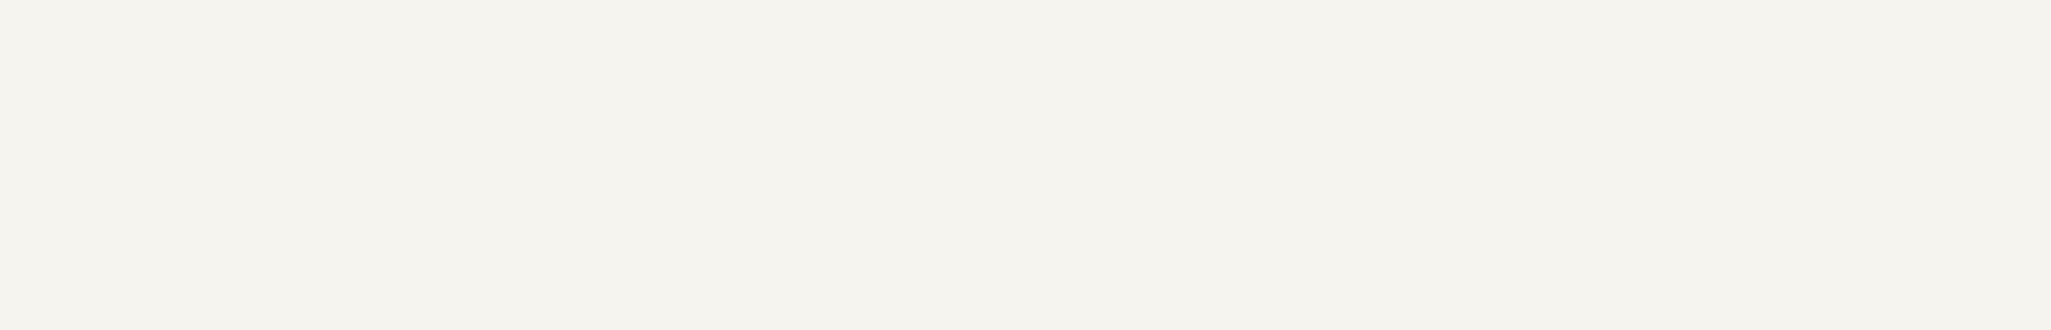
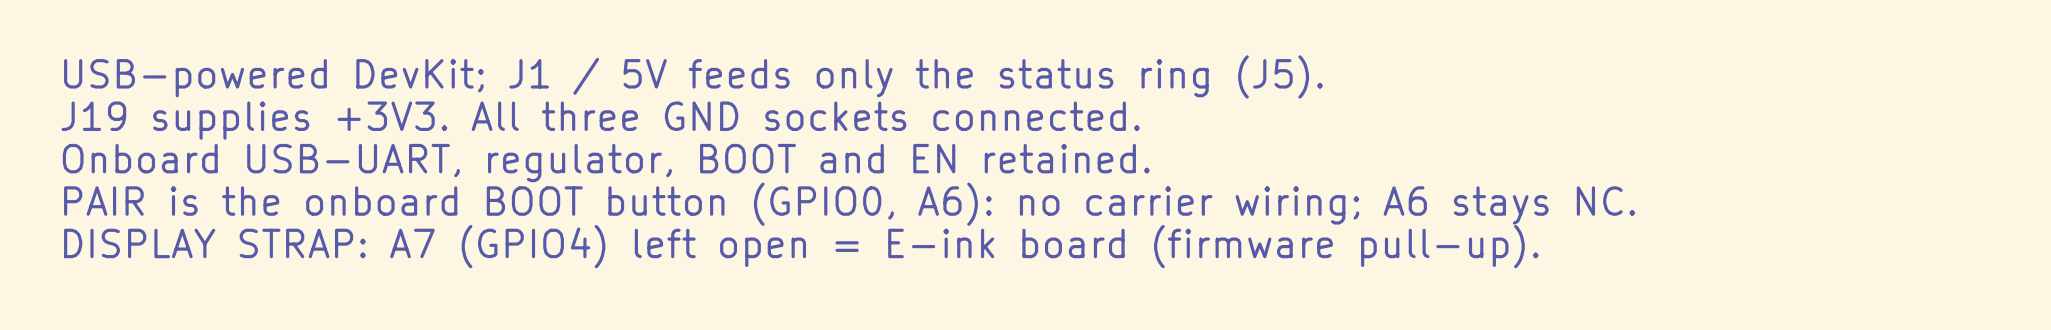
text: none -> USB-powered DevKit; J1 / 5V feeds only the status ring (J5). (693, 76)
text: none -> J19 supplies +3V3. All three GND sockets connected. (600, 120)
text: none -> Onboard USB-UART, regulator, BOOT and EN retained. (606, 163)
text: none -> PAIR is the onboard BOOT button (GPIO0, A6): no carrier wiring; A6 stays NC. (849, 204)
text: none -> DISPLAY STRAP: A7 (GPIO4) left open = E-ink board (firmware pull-up). (801, 246)

